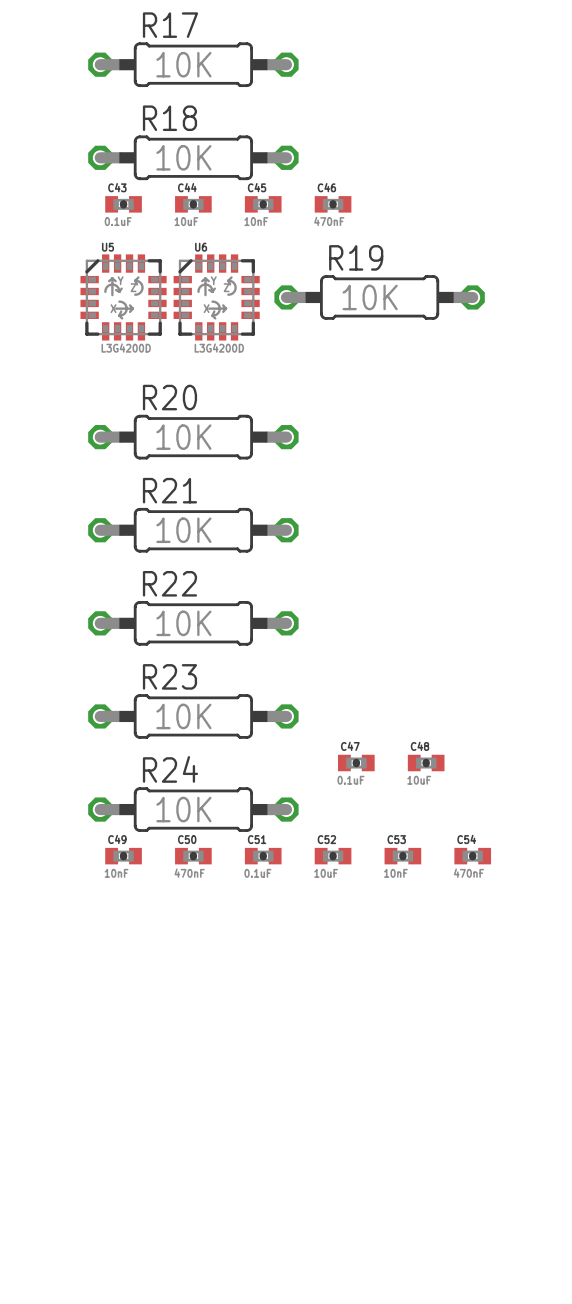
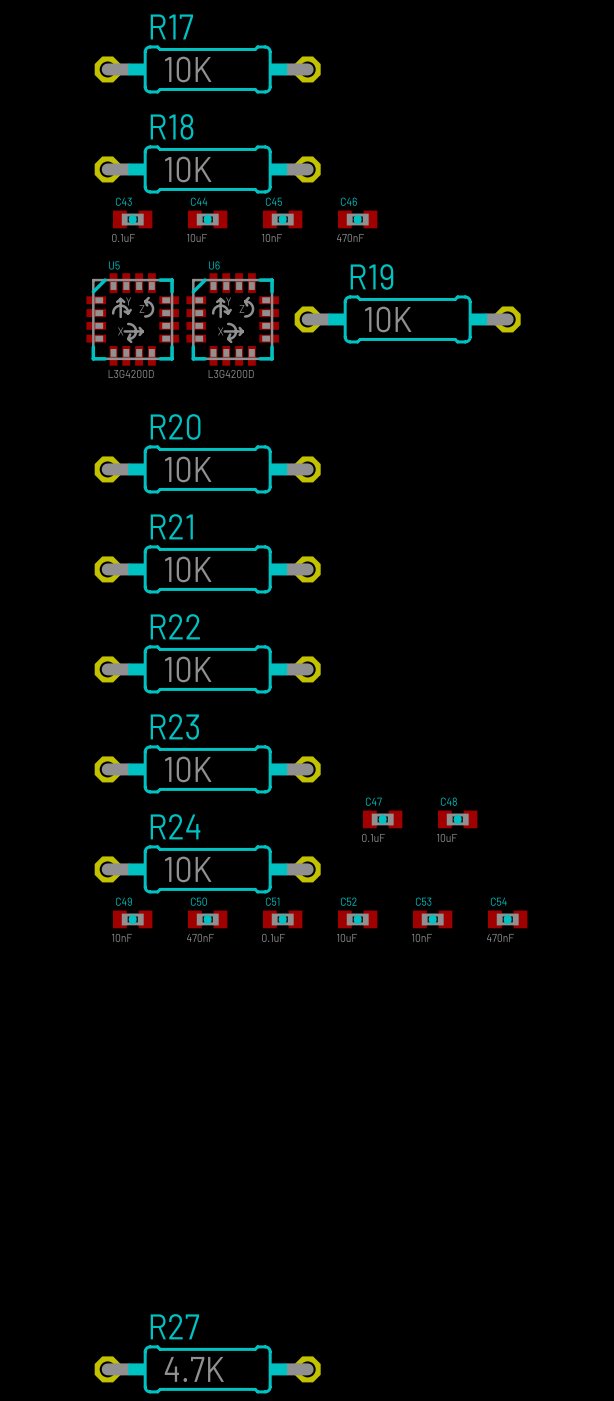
R27: none -> 4.7K (207, 1369)

